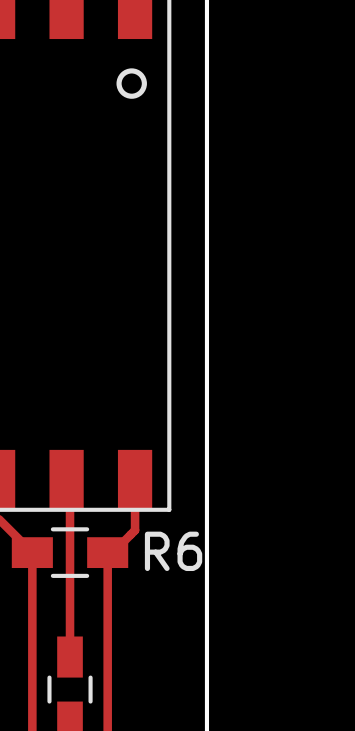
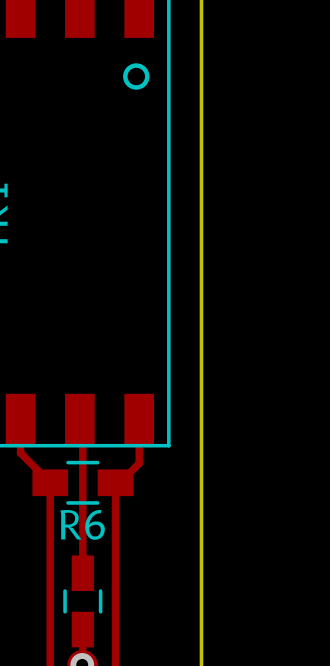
R6 name position: R6 (173, 551) -> R6 (82, 524)

